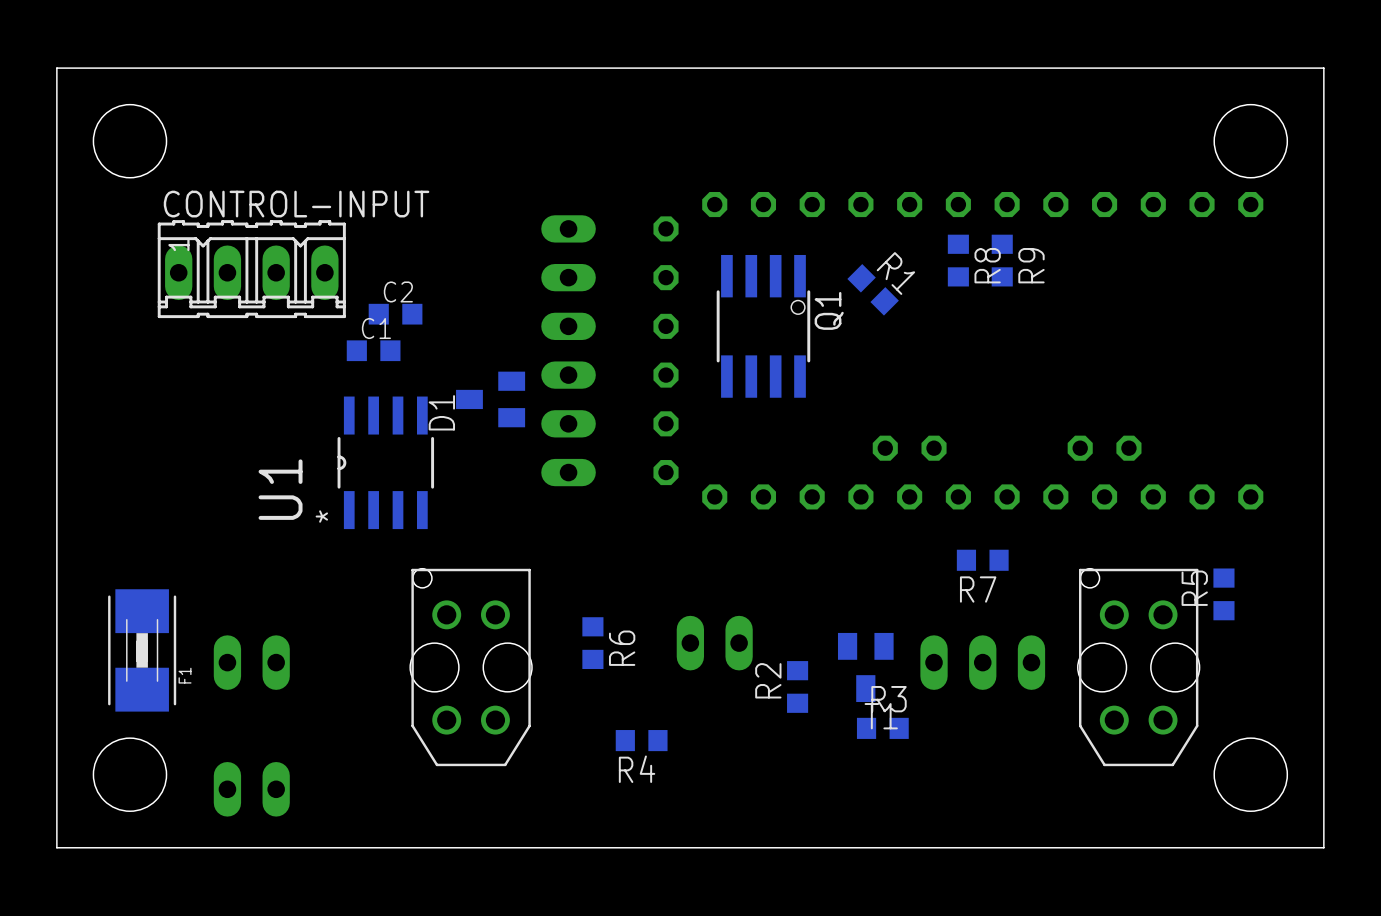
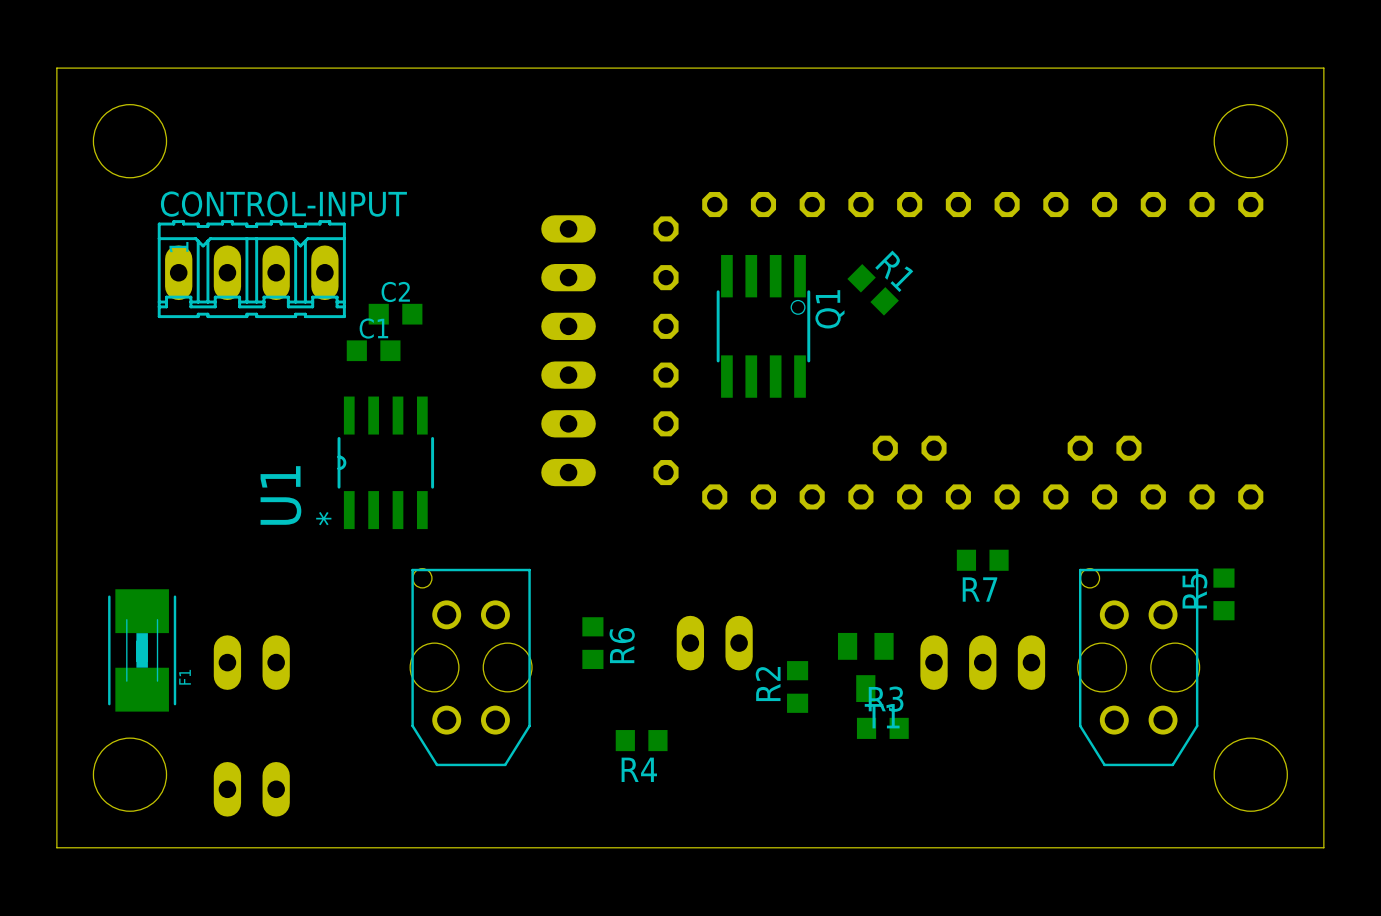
R8: (958, 260) -> none
R9: (1002, 260) -> none
D1: (490, 399) -> none

